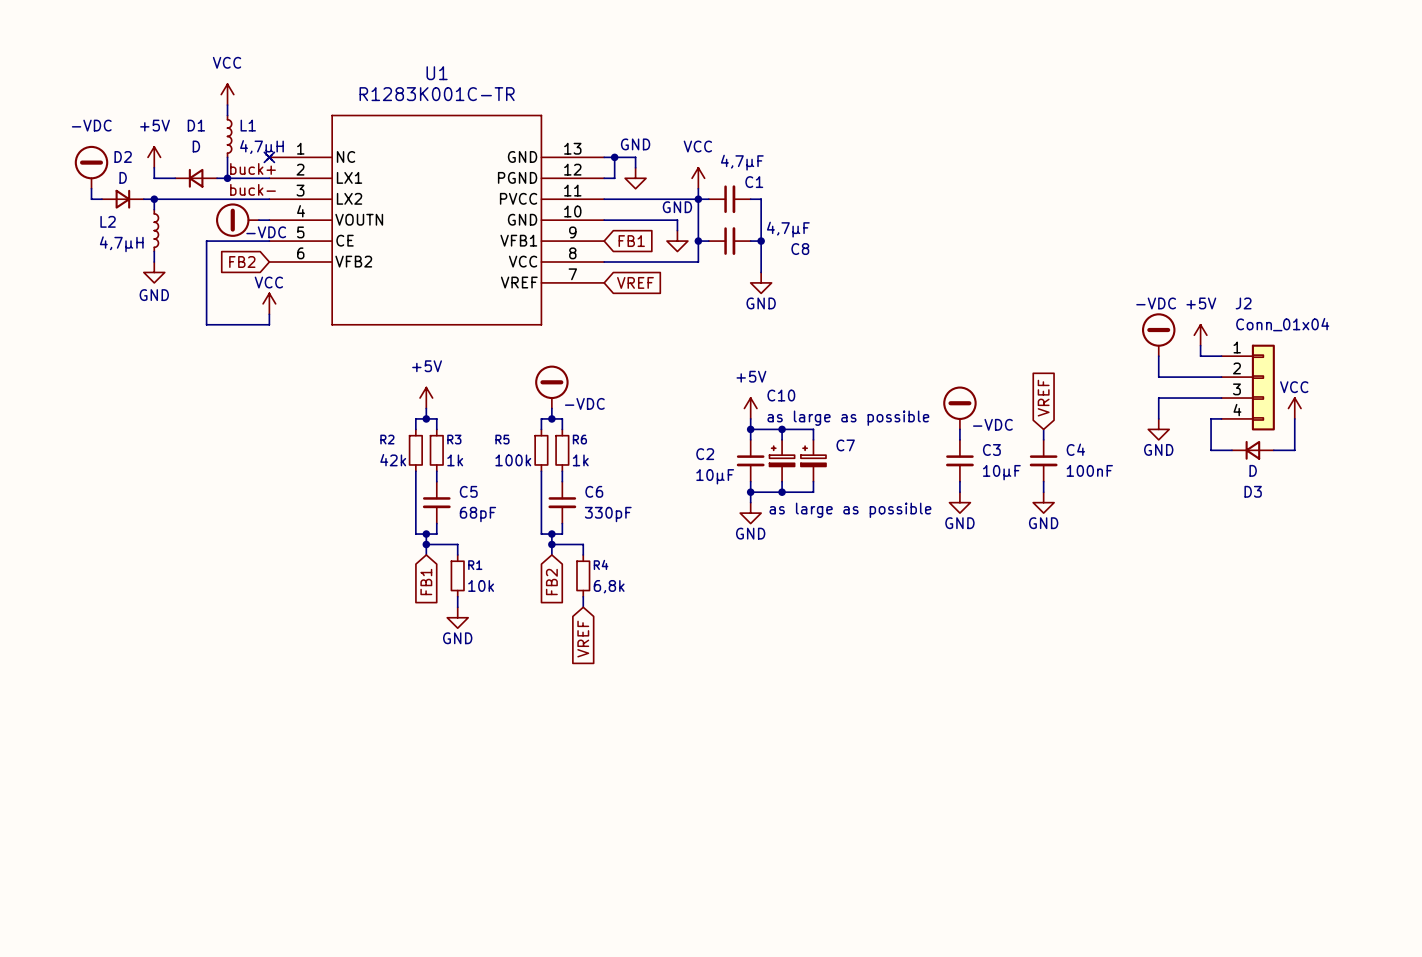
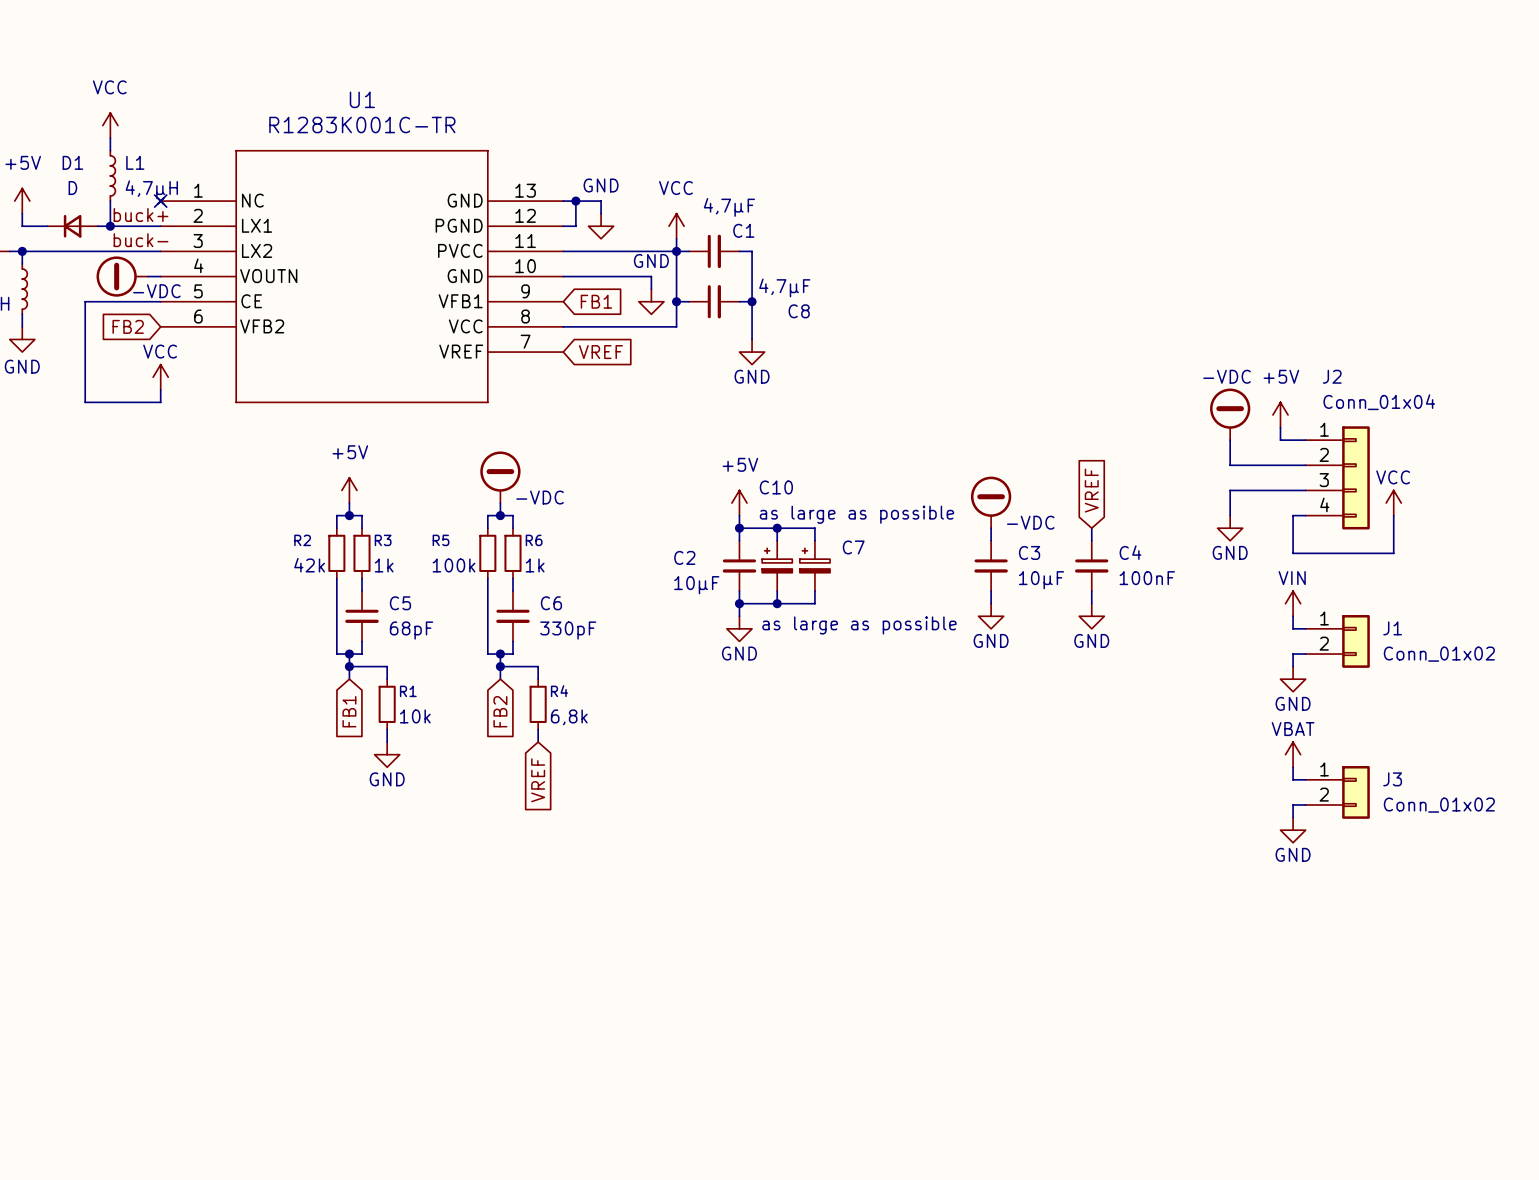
D3: D (1252, 450) -> none
power symbol: none -> VIN (1293, 603)
wire: none -> (1293, 616) (1293, 628) (1305, 628)
J1: none -> Conn_01x02 (1337, 641)
wire: none -> (1305, 654) (1293, 654) (1293, 666)
power symbol: none -> GND (1293, 679)
power symbol: none -> VBAT (1293, 754)
wire: none -> (1293, 767) (1293, 779) (1305, 779)
J3: none -> Conn_01x02 (1337, 792)
wire: none -> (1305, 805) (1293, 805) (1293, 817)
power symbol: none -> GND (1293, 830)

